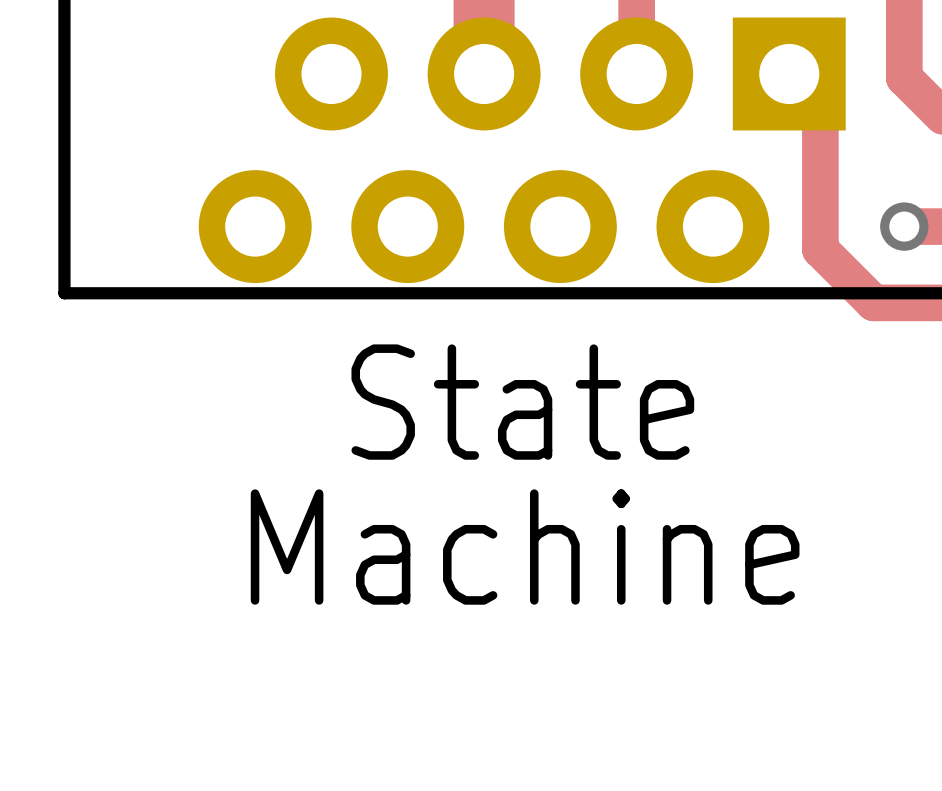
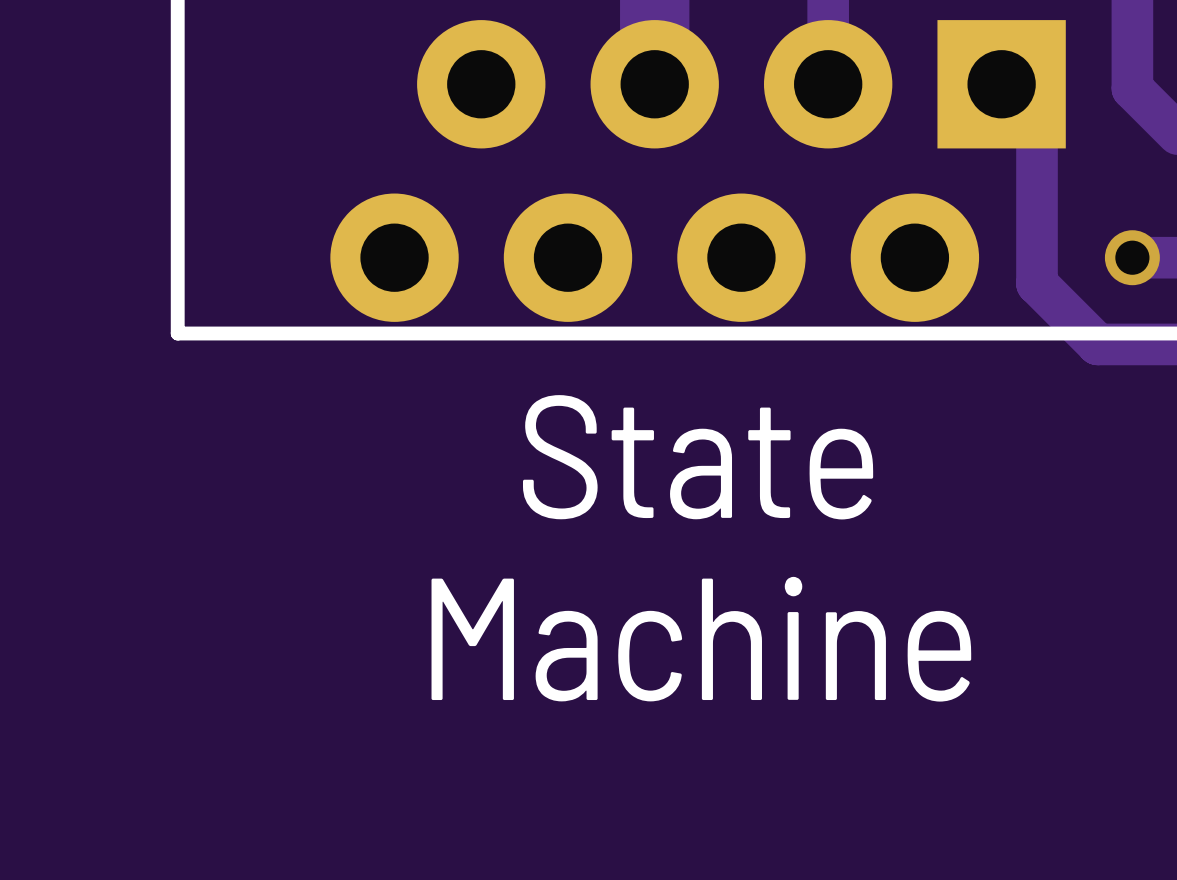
text position: Machine (525, 547) -> Machine (701, 639)

